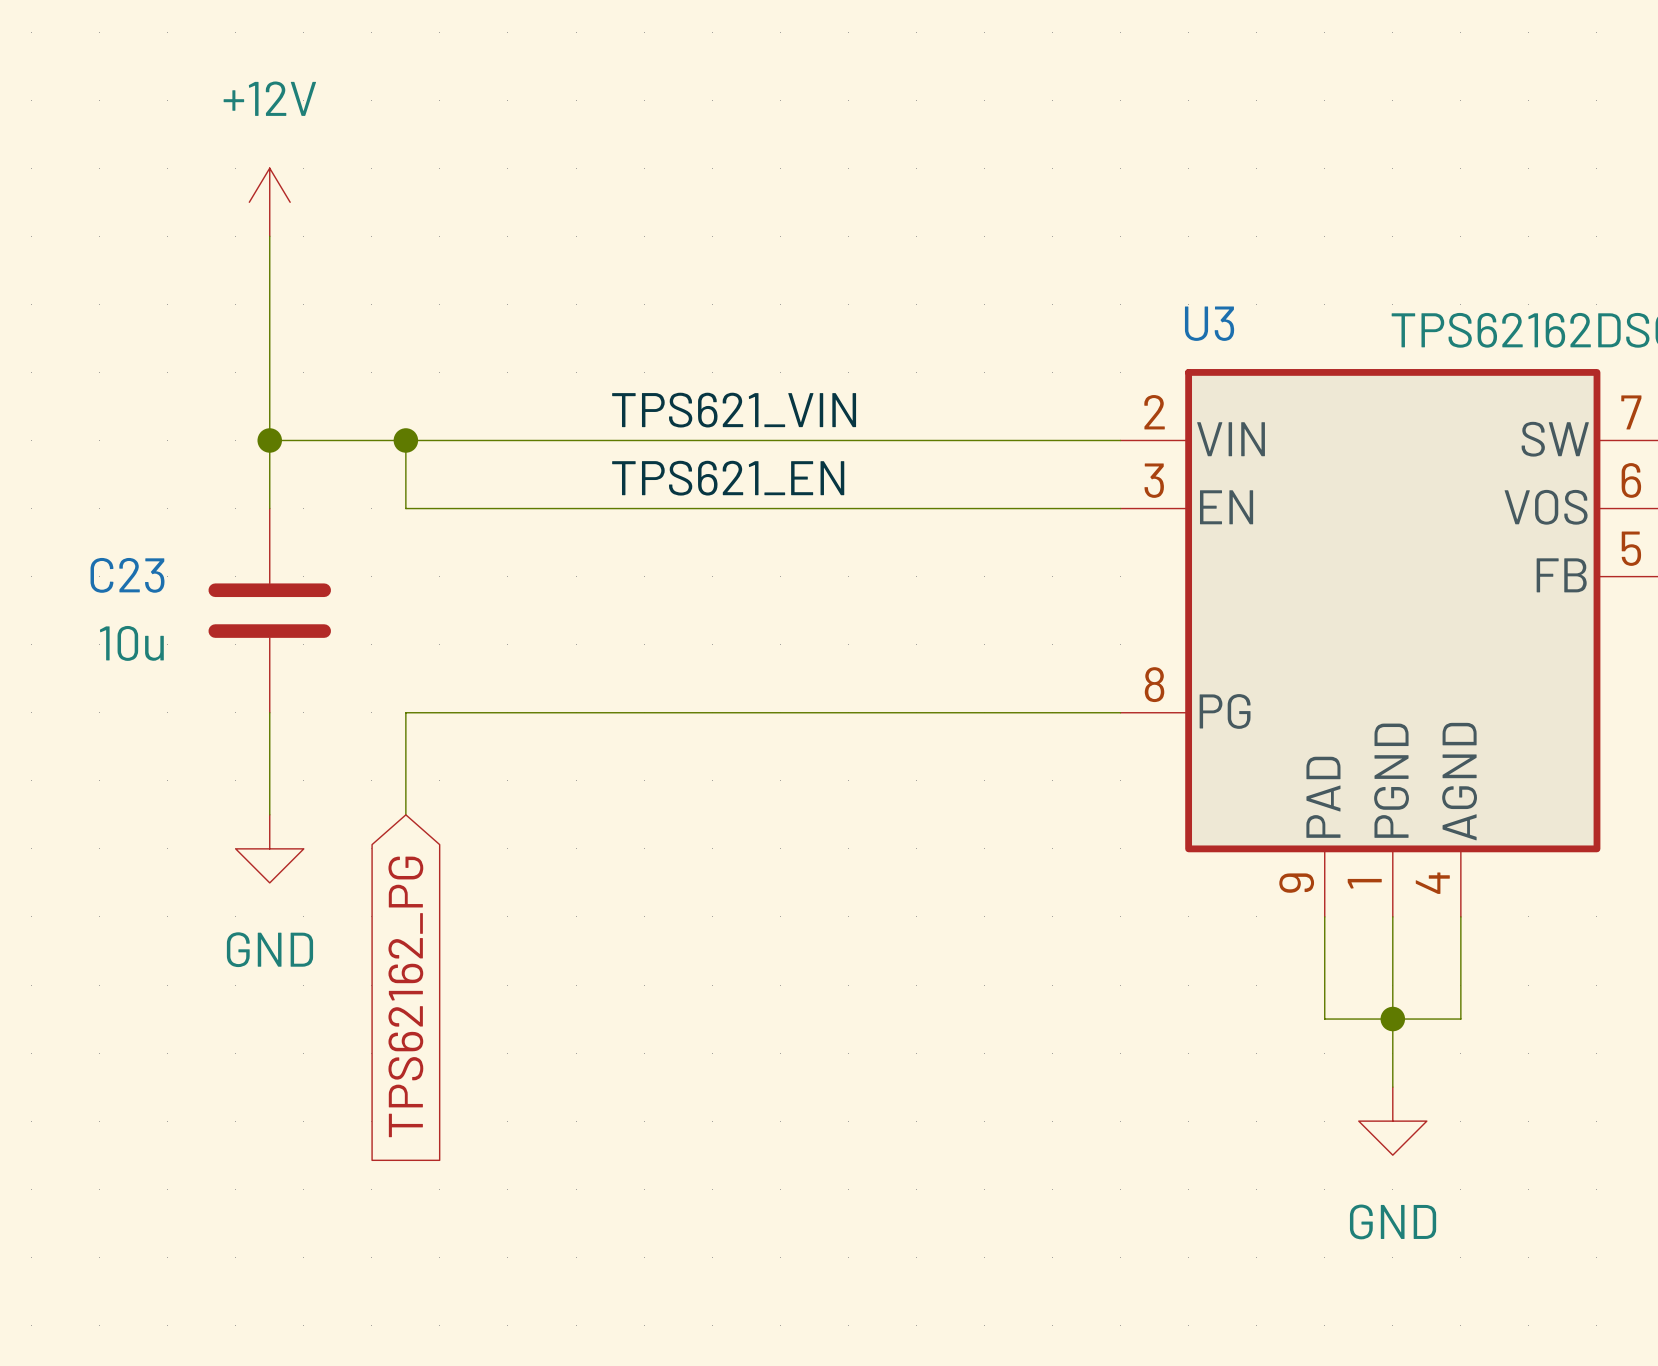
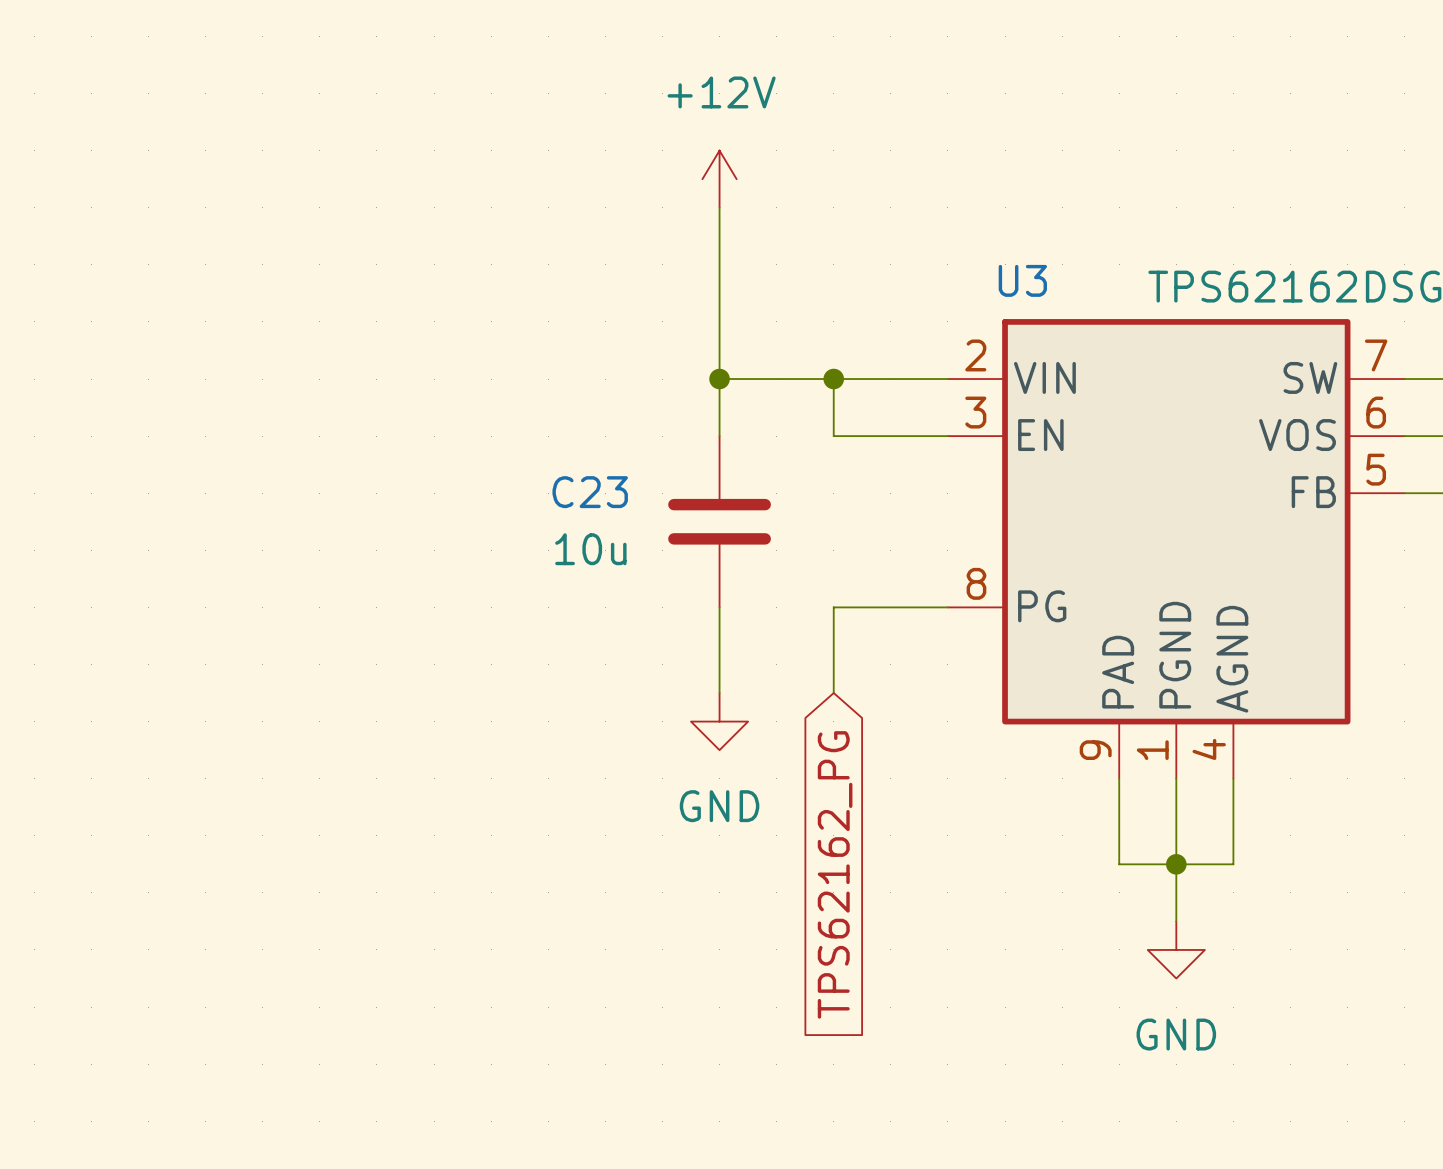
power symbol position: +12V (269, 202) -> +12V (719, 179)
wire: (269, 236) (269, 508) -> (719, 207) (719, 436)
label: TPS621_VIN (734, 410) -> none
wire: (269, 440) (848, 440) -> none
junction: (269, 440) -> none
wire: (405, 440) (405, 508) (984, 508) -> (833, 379) (833, 436)
junction: (405, 440) -> none
junction: none -> (719, 379)
junction: none -> (833, 379)
label: TPS621_EN (728, 478) -> none
C23 position: (269, 610) -> (719, 521)
wire: (269, 712) (269, 814) -> (719, 607) (719, 693)
wire: (984, 712) (405, 712) (405, 814) -> (833, 607) (833, 693)
power symbol position: GND (269, 848) -> GND (719, 721)
global label position: TPS62162_PG (405, 996) -> TPS62162_PG (835, 874)

